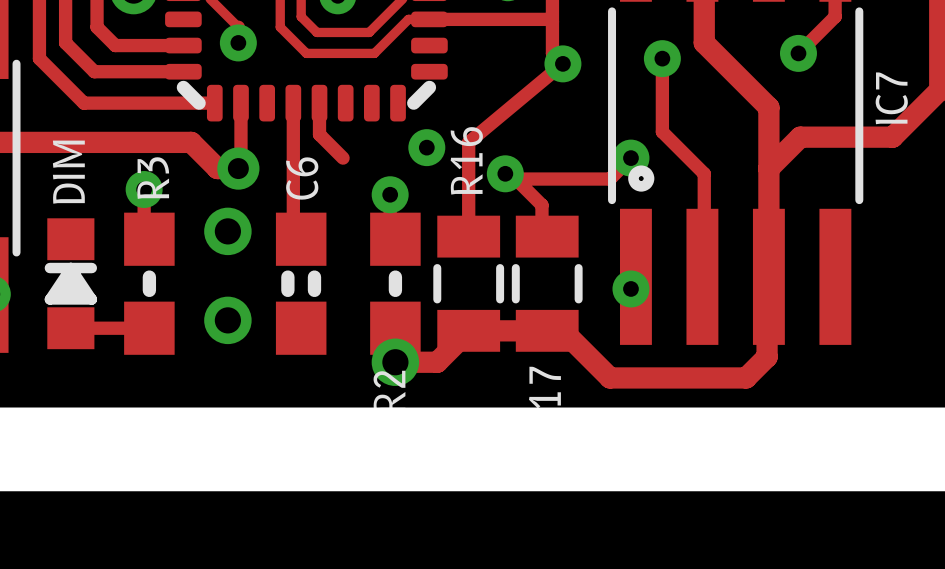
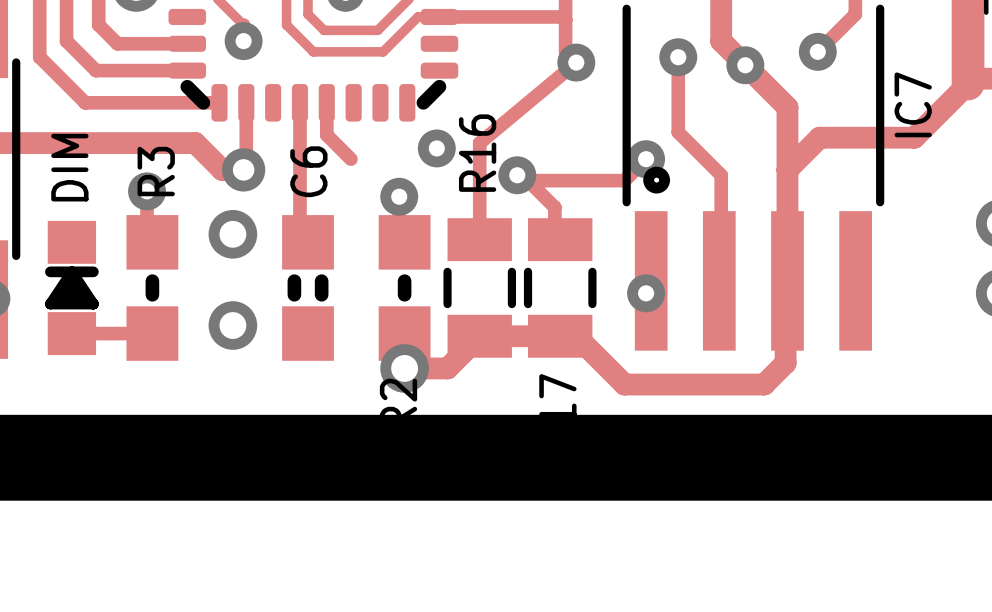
via: none -> (745, 65)

